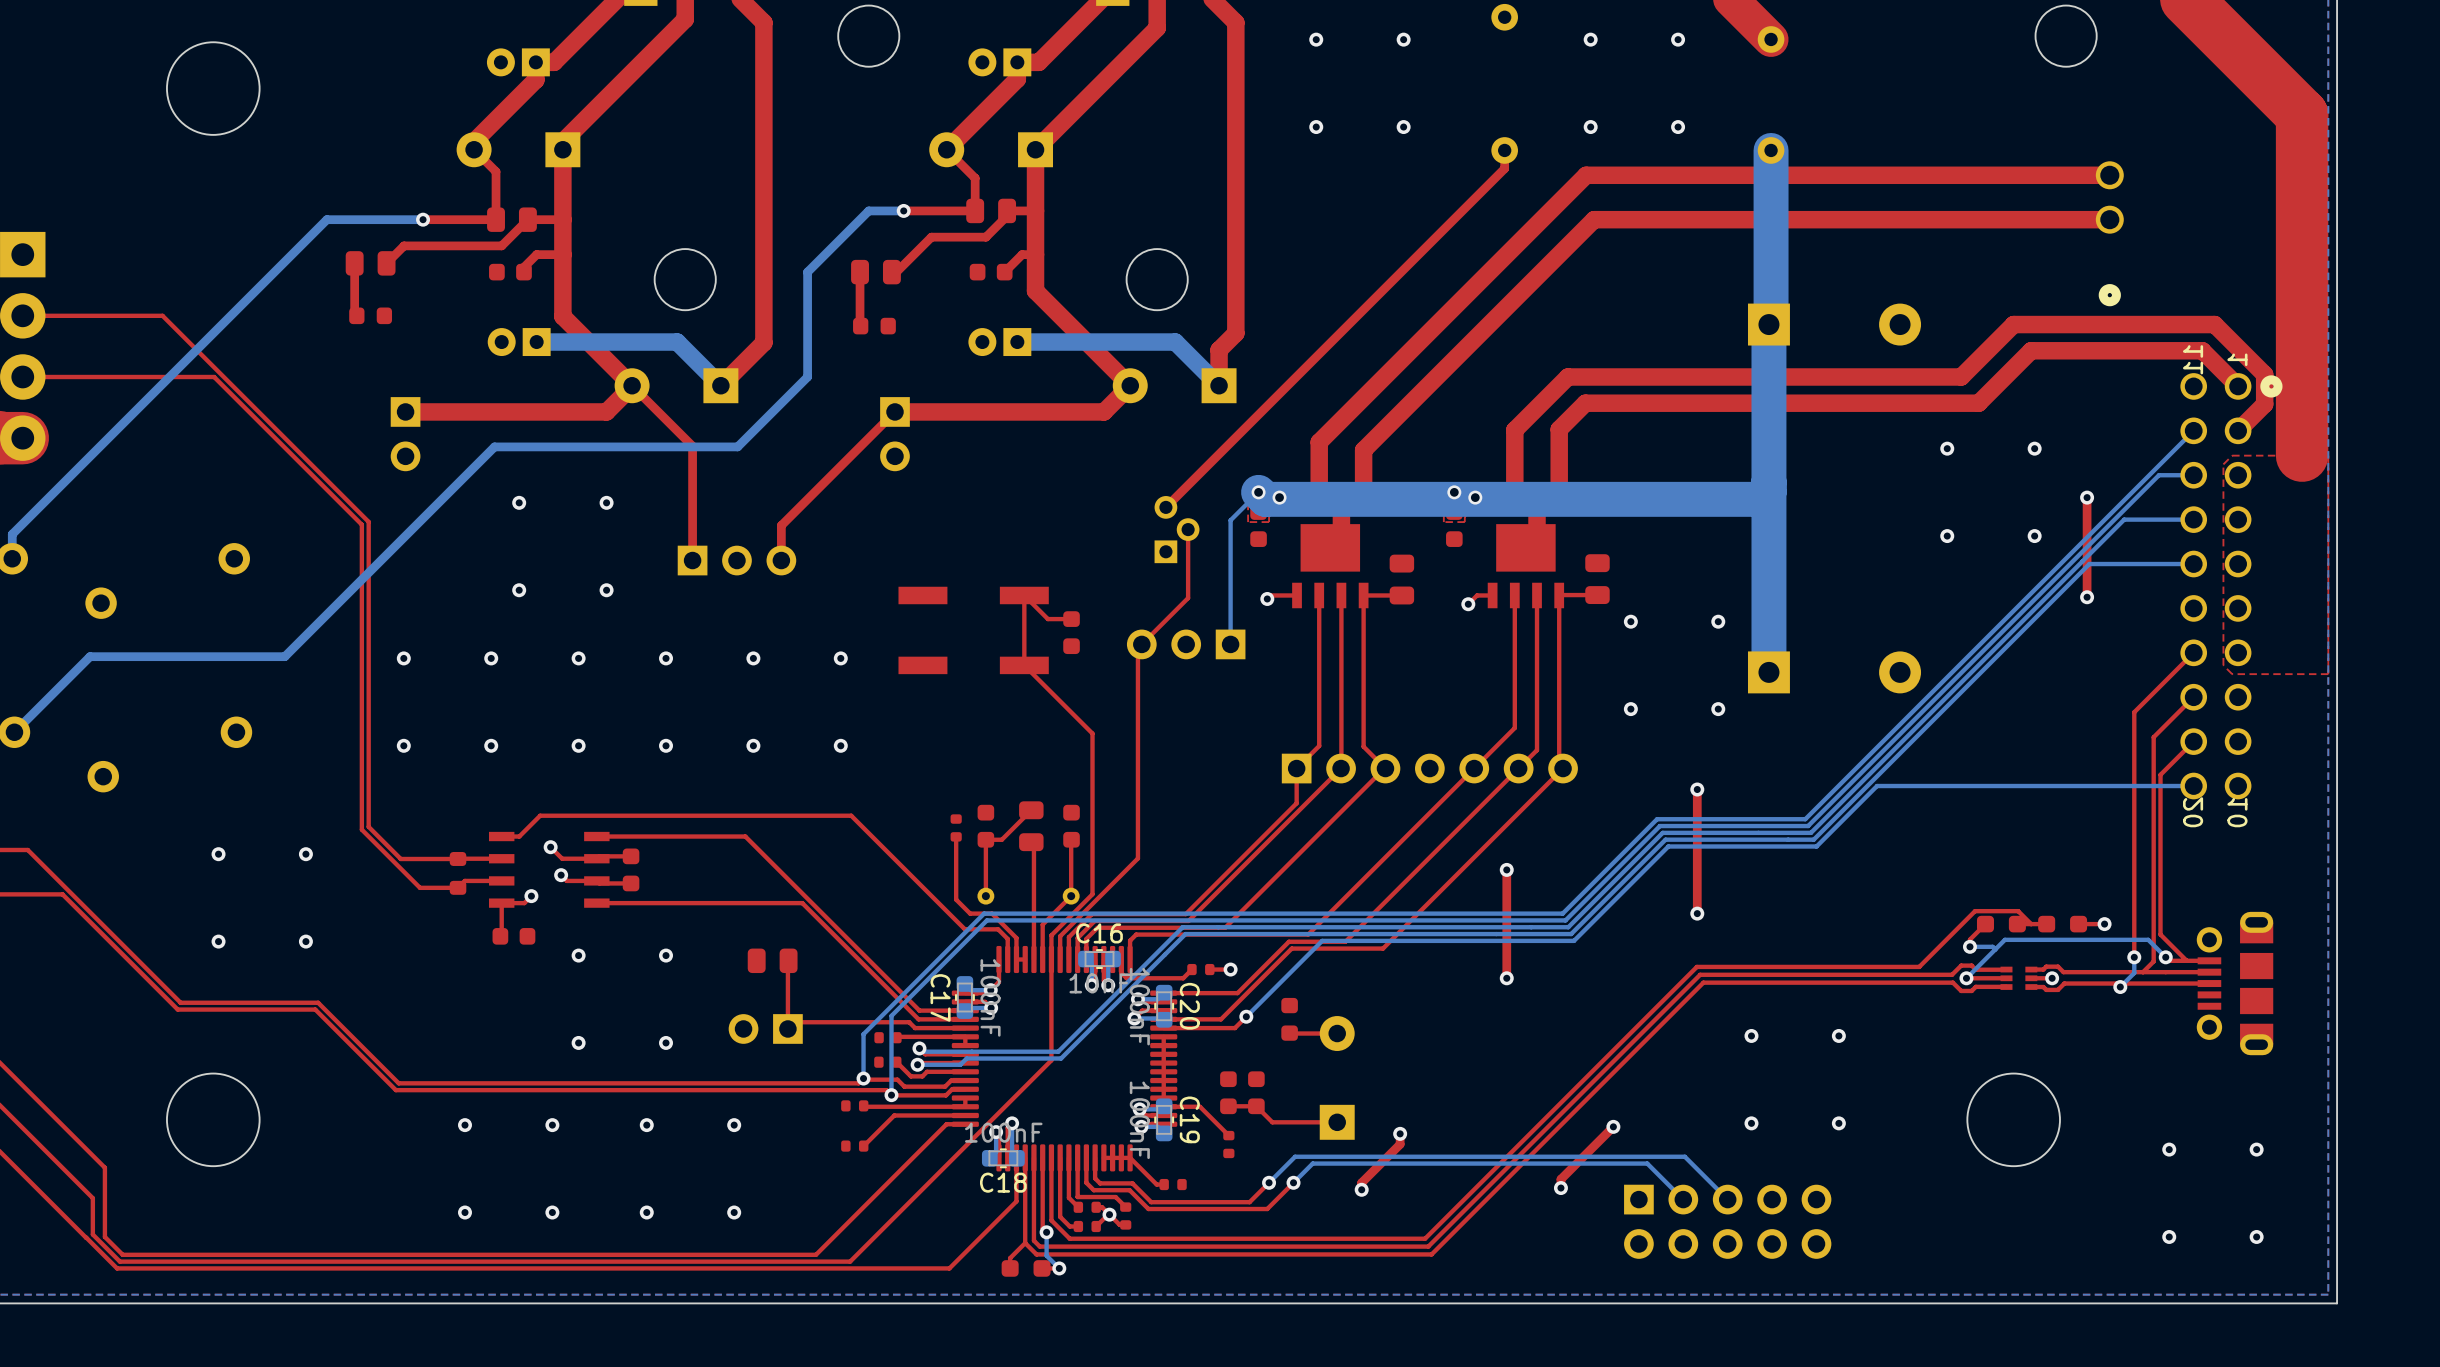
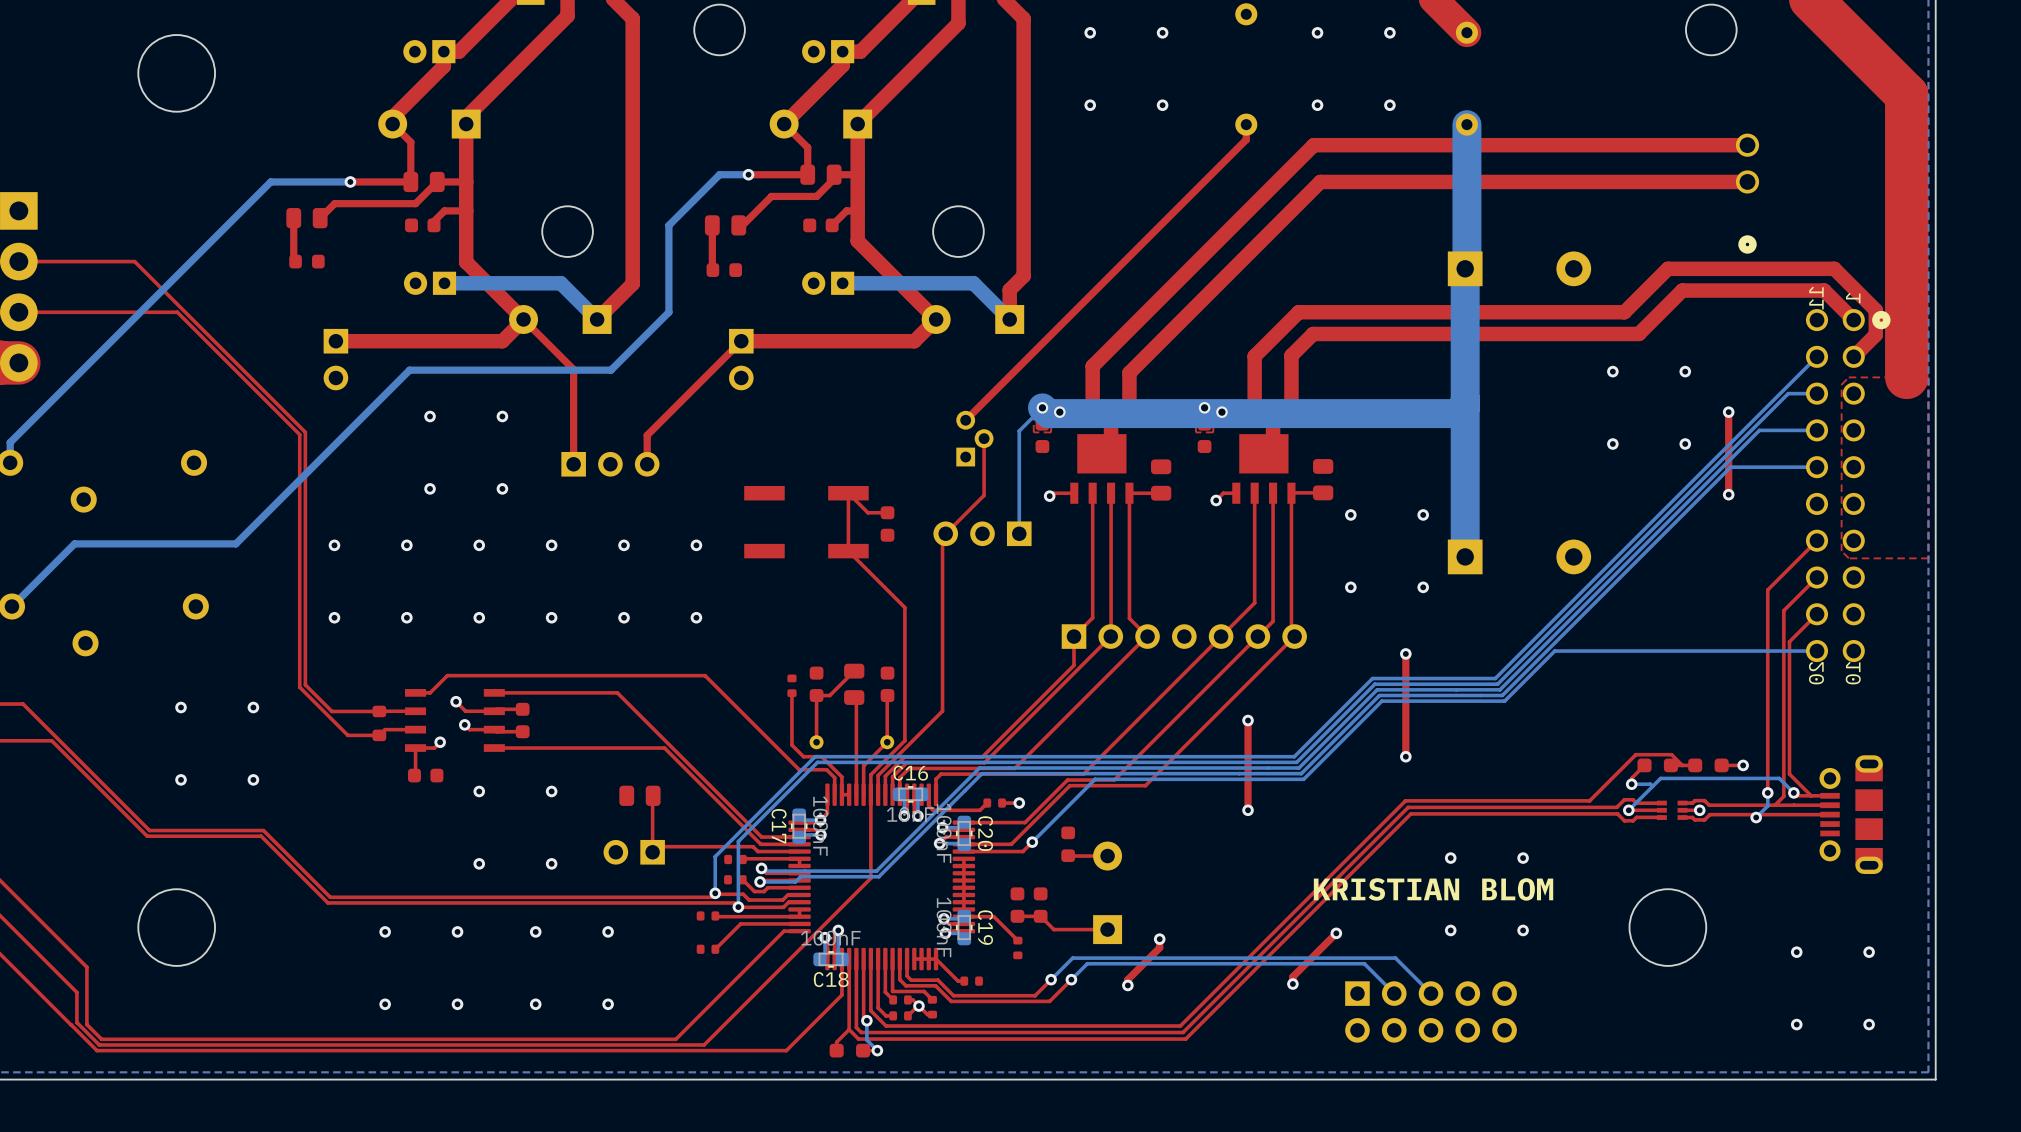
text: none -> KRISTIAN BLOM (1433, 889)

